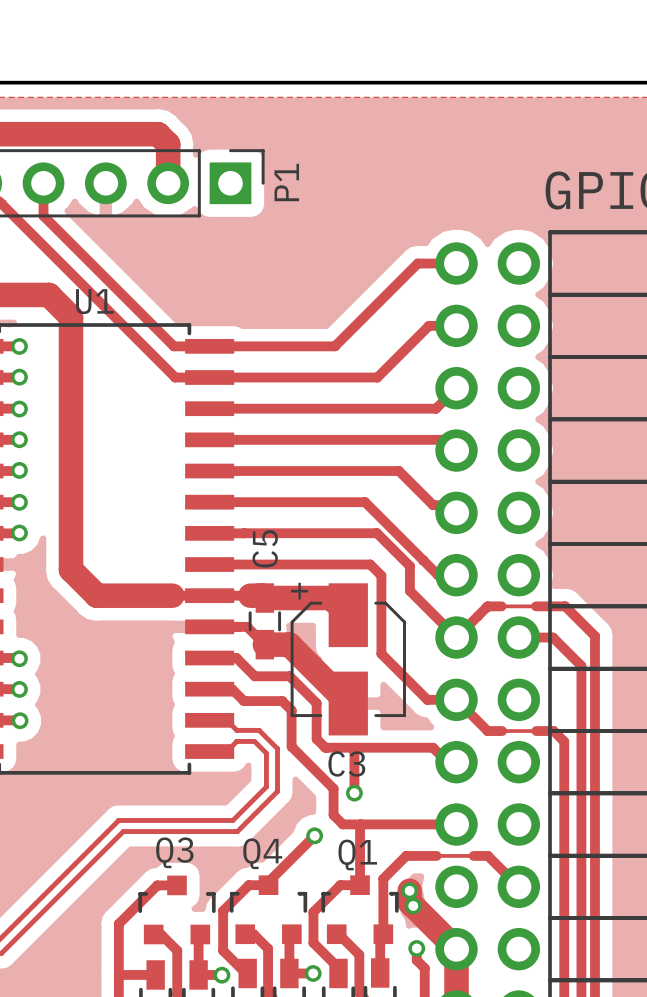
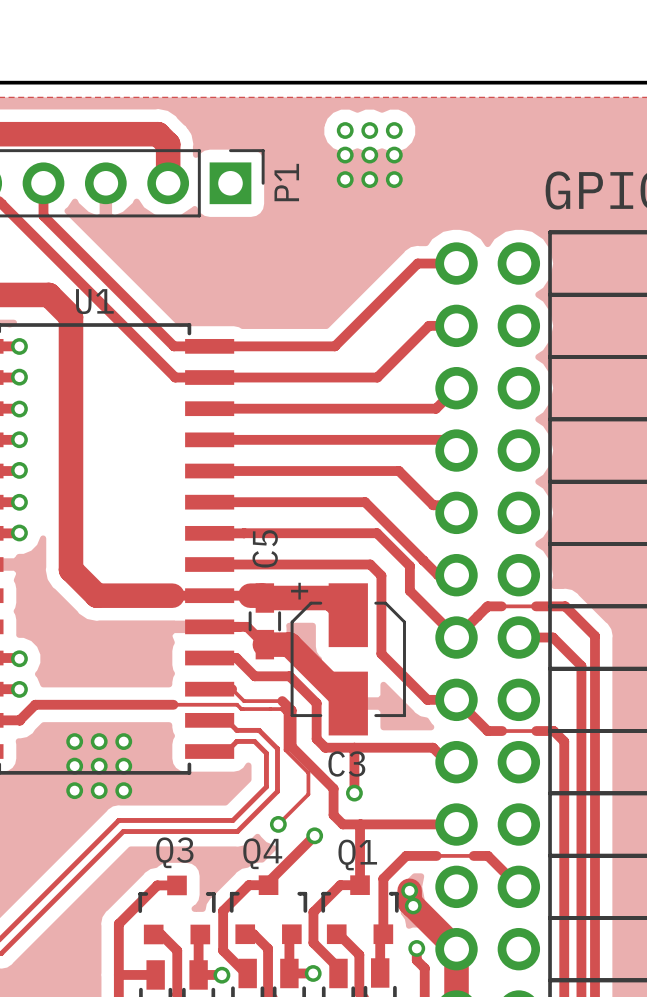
via: none -> (345, 130)
via: none -> (369, 130)
via: none -> (394, 130)
via: none -> (345, 155)
via: none -> (369, 155)
via: none -> (394, 155)
via: none -> (345, 179)
via: none -> (369, 179)
via: none -> (394, 179)
track width: thick (232, 689) (244, 701) (282, 701) -> thin (232, 689) (244, 701) (282, 701)
track: none -> (19, 720) (35, 704) (237, 704) (241, 709) (281, 709) (285, 713) (285, 750) (308, 772) (308, 794) (278, 824)
via: (20, 720) -> none
via: none -> (74, 741)
via: none -> (99, 741)
via: none -> (123, 741)
via: none -> (74, 766)
via: none -> (99, 766)
via: none -> (123, 766)
via: none -> (74, 790)
via: none -> (99, 790)
via: none -> (123, 790)
via: none -> (278, 824)

